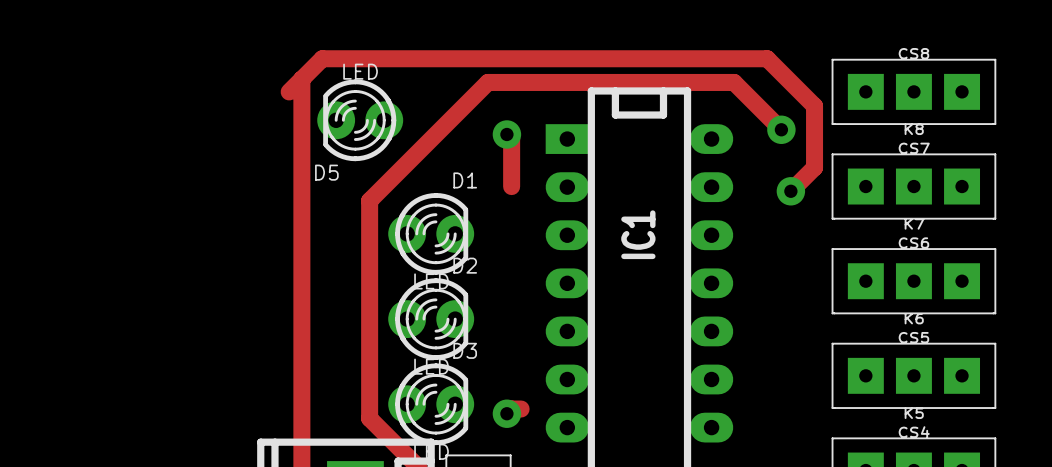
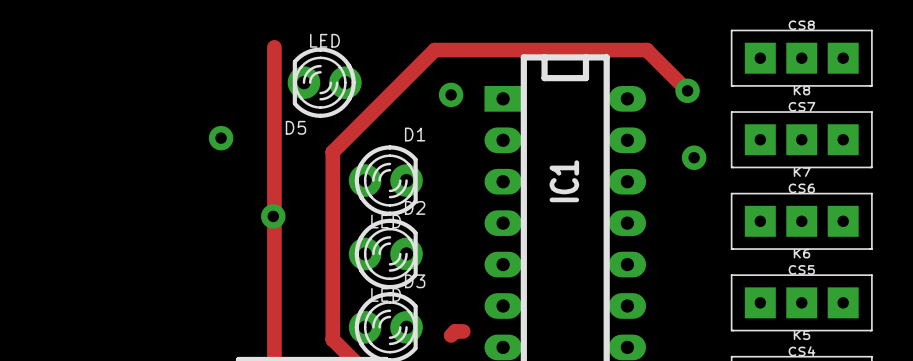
track: (289, 91) (322, 58) (767, 58) (814, 106) (814, 167) (790, 191) -> none
track: (506, 134) (511, 139) (511, 186) -> none
via: none -> (221, 138)
via position: (790, 191) -> (694, 157)
via: none -> (273, 216)
via: (506, 413) -> none

